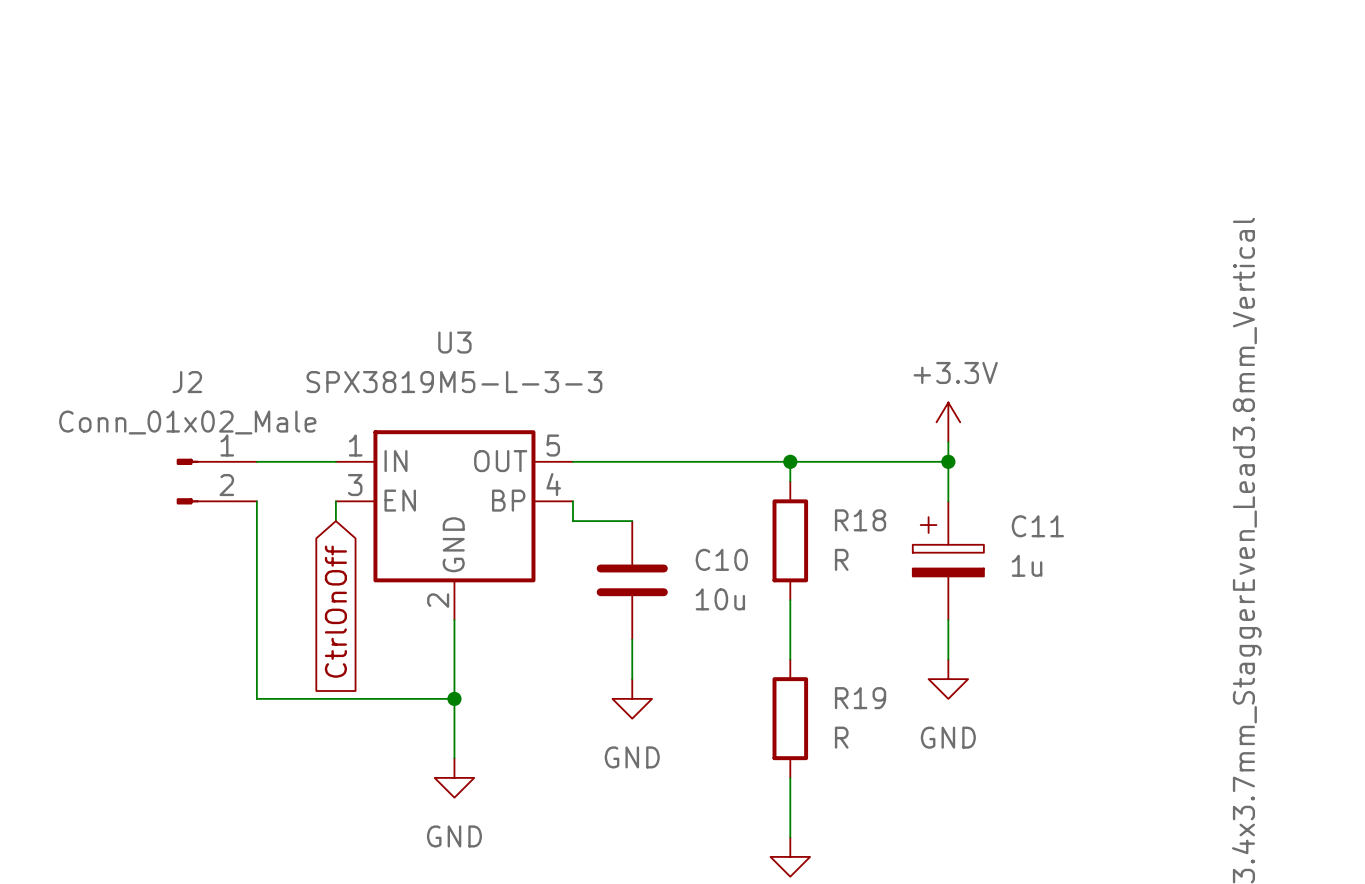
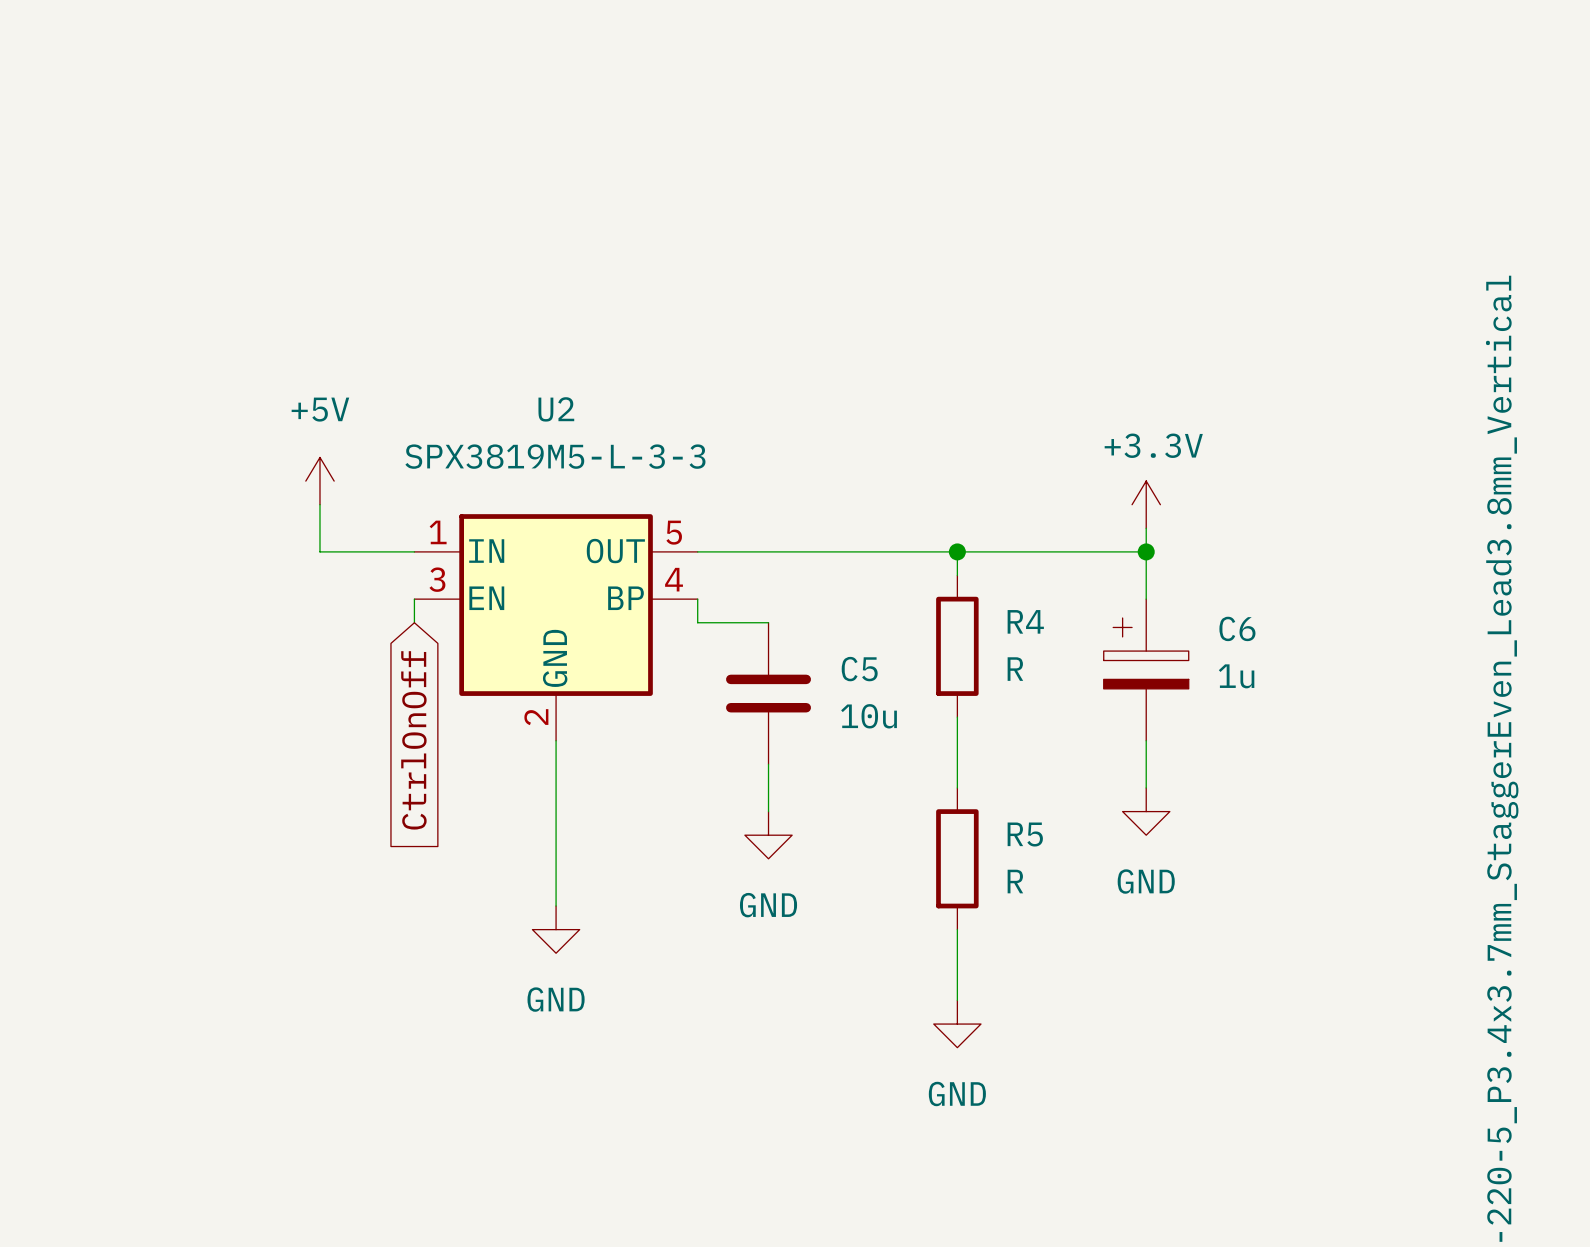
U3 name: U3 (454, 342) -> U2 (556, 409)
power symbol: none -> +5V (319, 481)
wire: none -> (319, 504) (319, 551)
J2: Conn_01x02_Male (216, 481) -> none
wire: (256, 501) (256, 698) (454, 698) -> none
R18 name: R18 (860, 520) -> R4 (1025, 621)
C11 name: C11 (1037, 526) -> C6 (1237, 628)
C10 name: C10 (721, 559) -> C5 (859, 669)
junction: (454, 698) -> none
R19 name: R19 (860, 698) -> R5 (1025, 834)

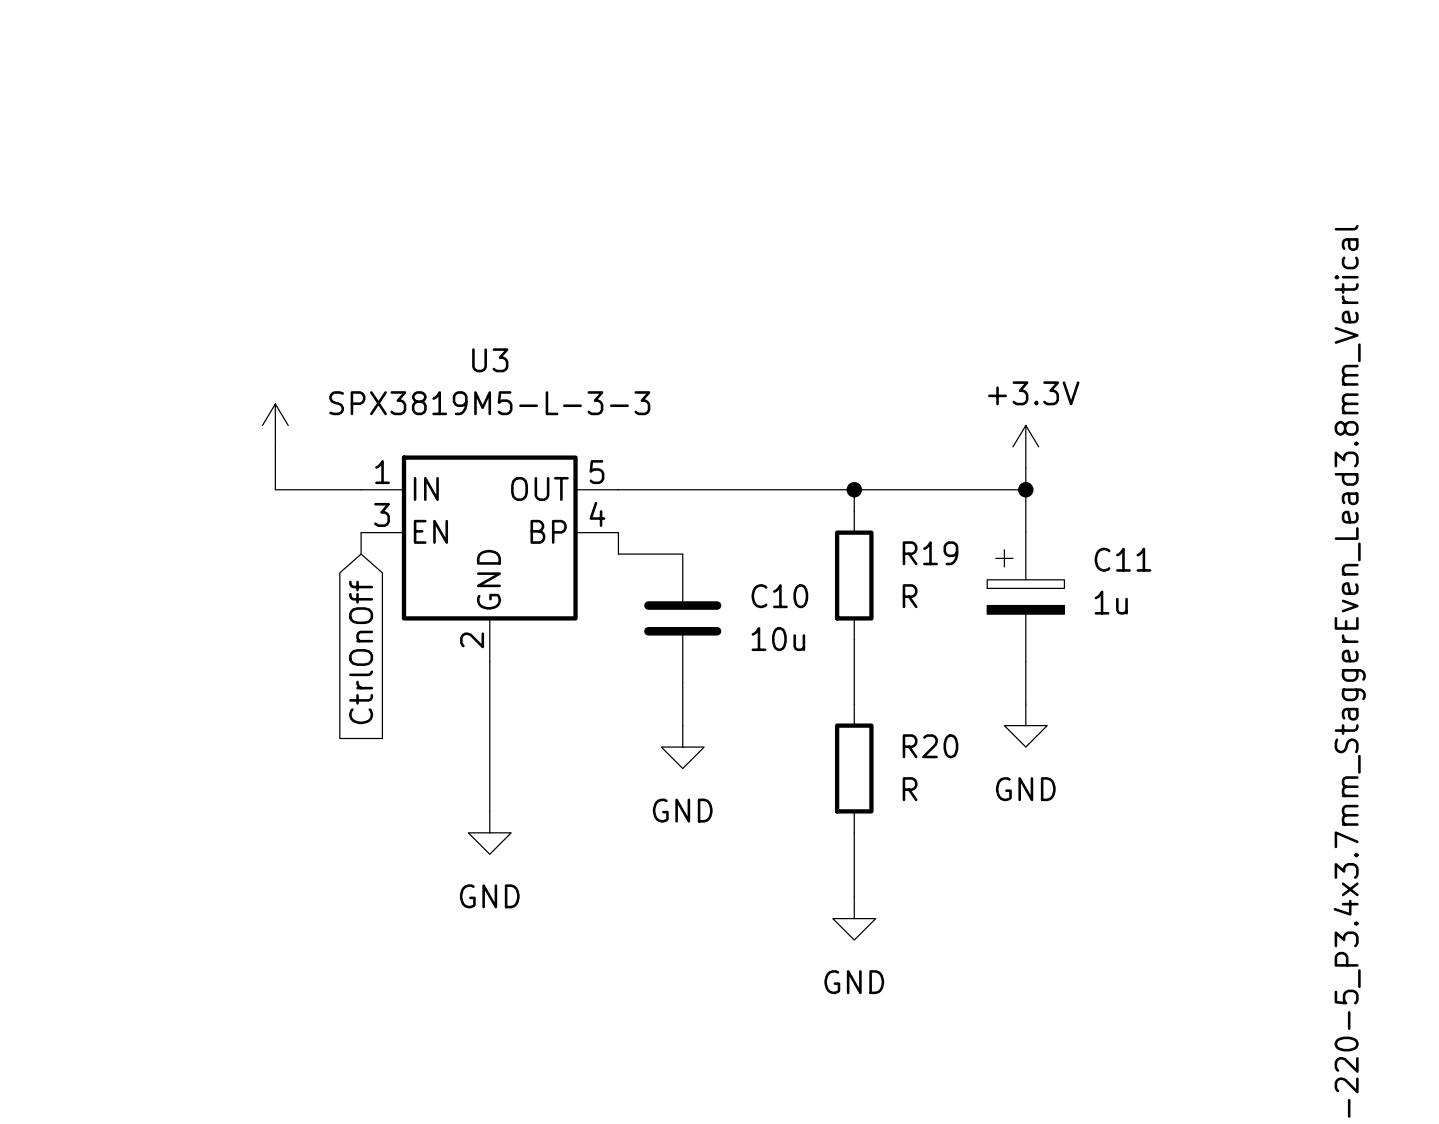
power symbol text: +5V (320, 409) -> none
U2 name: U2 (556, 409) -> U3 (490, 360)
R4 name: R4 (1025, 621) -> R19 (930, 553)
C6 name: C6 (1237, 628) -> C11 (1122, 559)
C5 name: C5 (859, 669) -> C10 (779, 596)
R5 name: R5 (1025, 834) -> R20 (930, 746)

